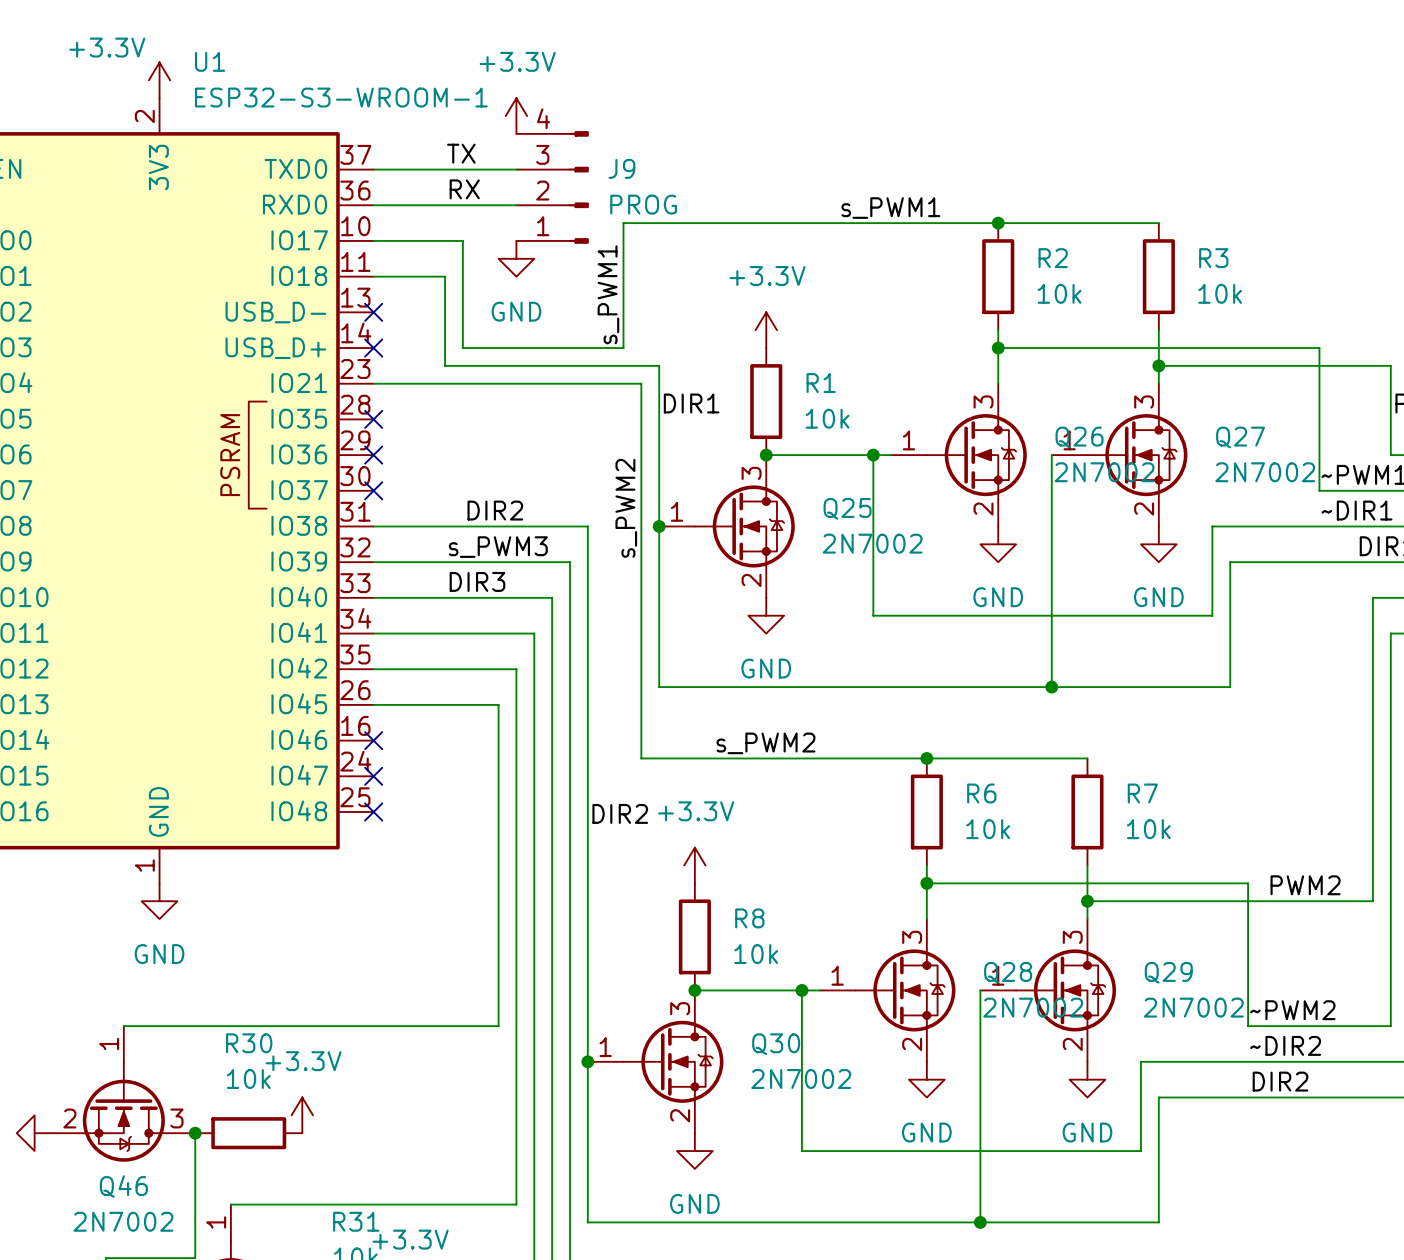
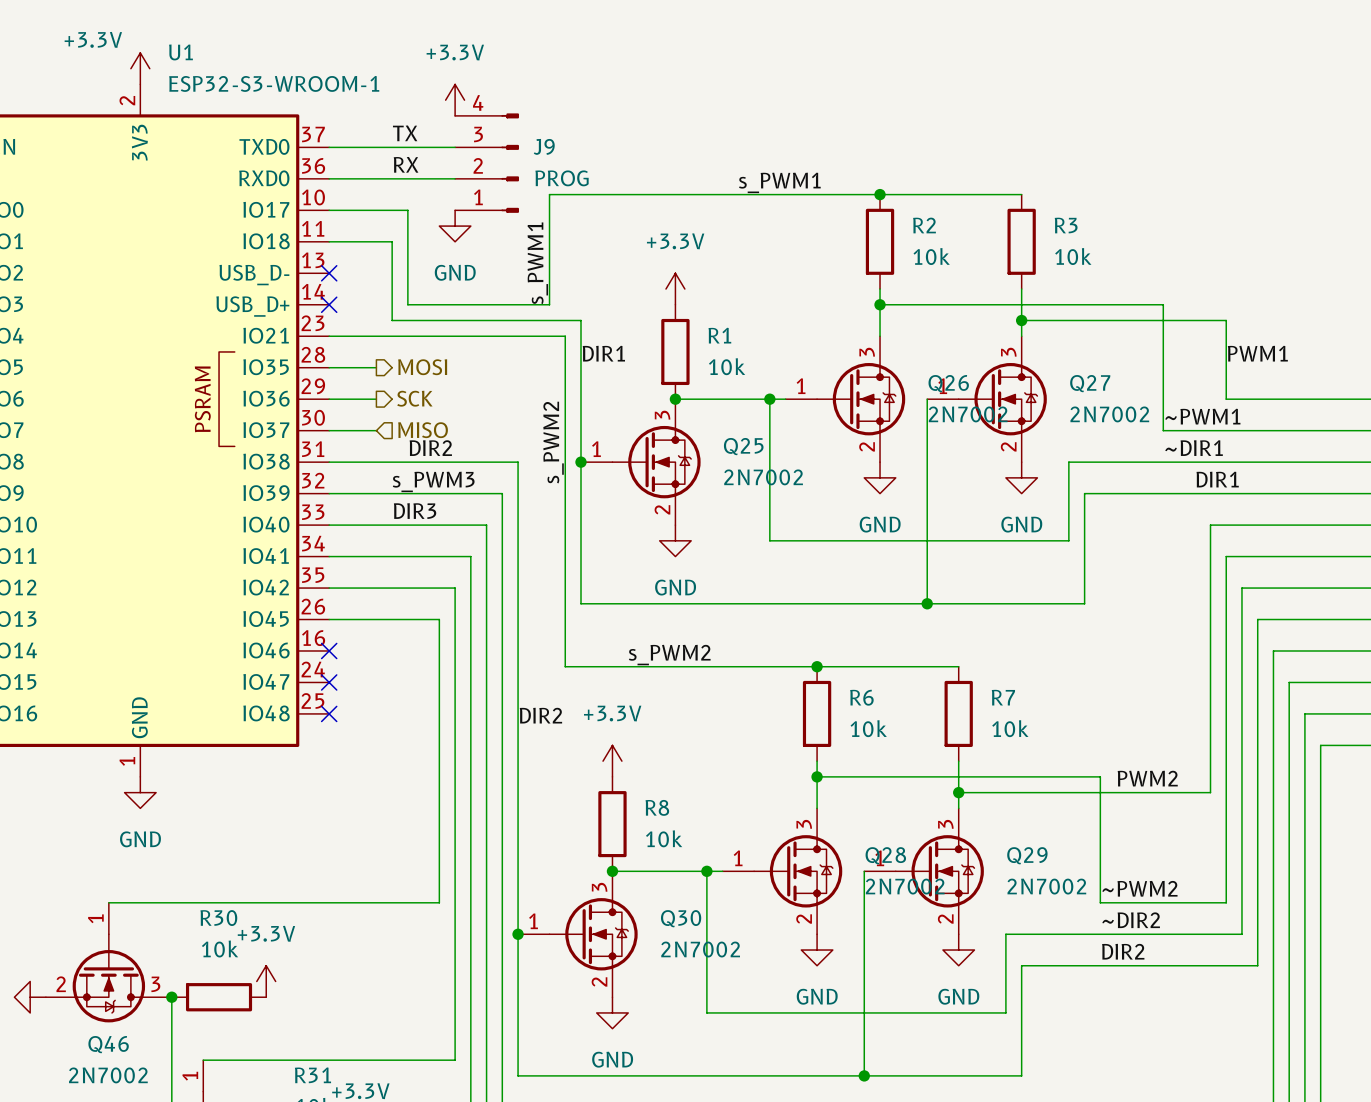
hierarchical label: none -> MOSI (422, 367)
wire: none -> (329, 367) (376, 367)
no-connect mark: (373, 419) -> none
hierarchical label: none -> SCK (414, 398)
wire: none -> (329, 399) (376, 399)
no-connect mark: (373, 455) -> none
wire: none -> (329, 430) (376, 430)
no-connect mark: (373, 490) -> none
hierarchical label: none -> MISO (423, 430)

